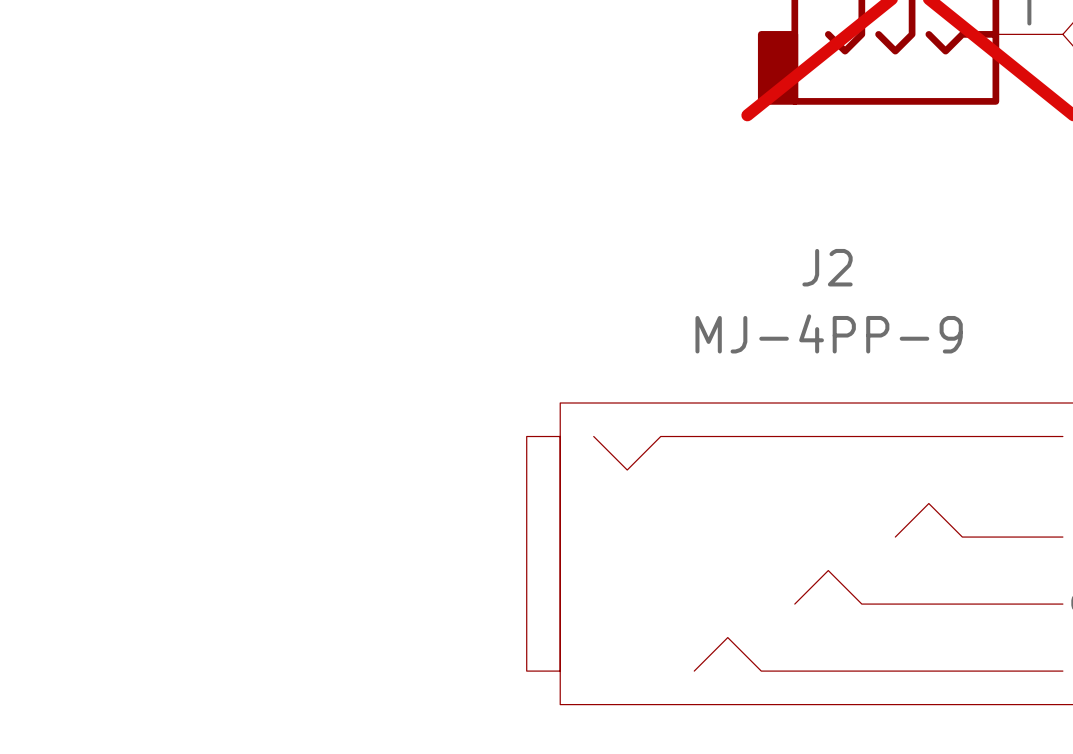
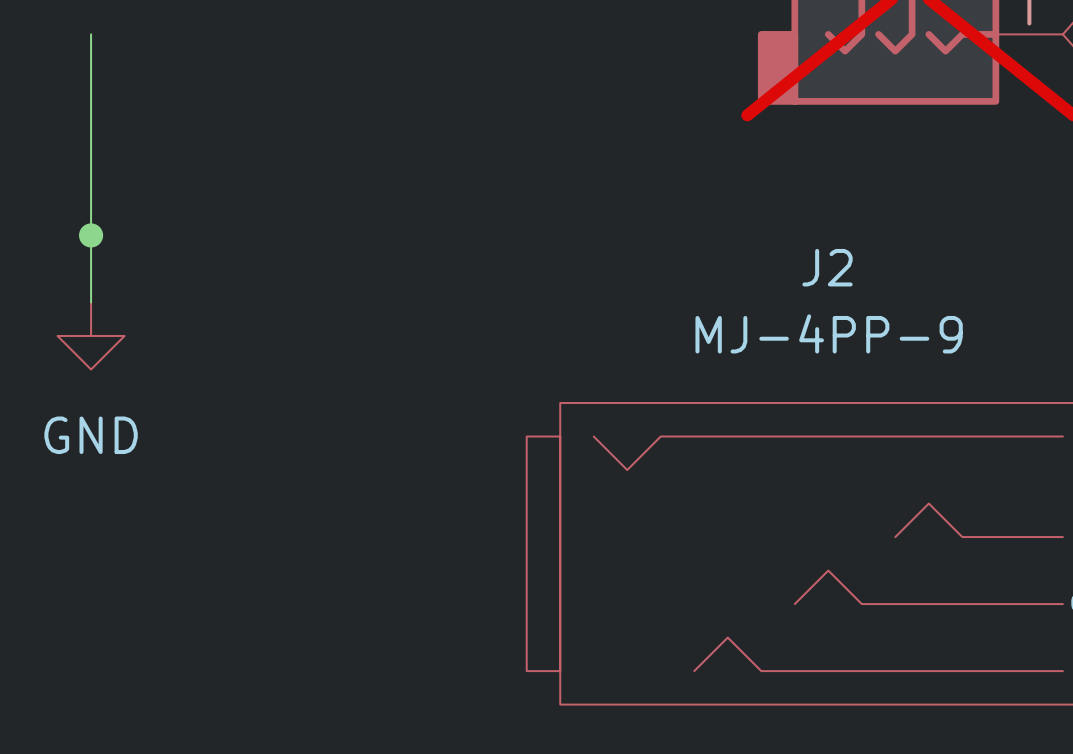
wire: none -> (91, 34) (91, 302)
junction: none -> (91, 235)
power symbol: none -> GND (91, 335)

